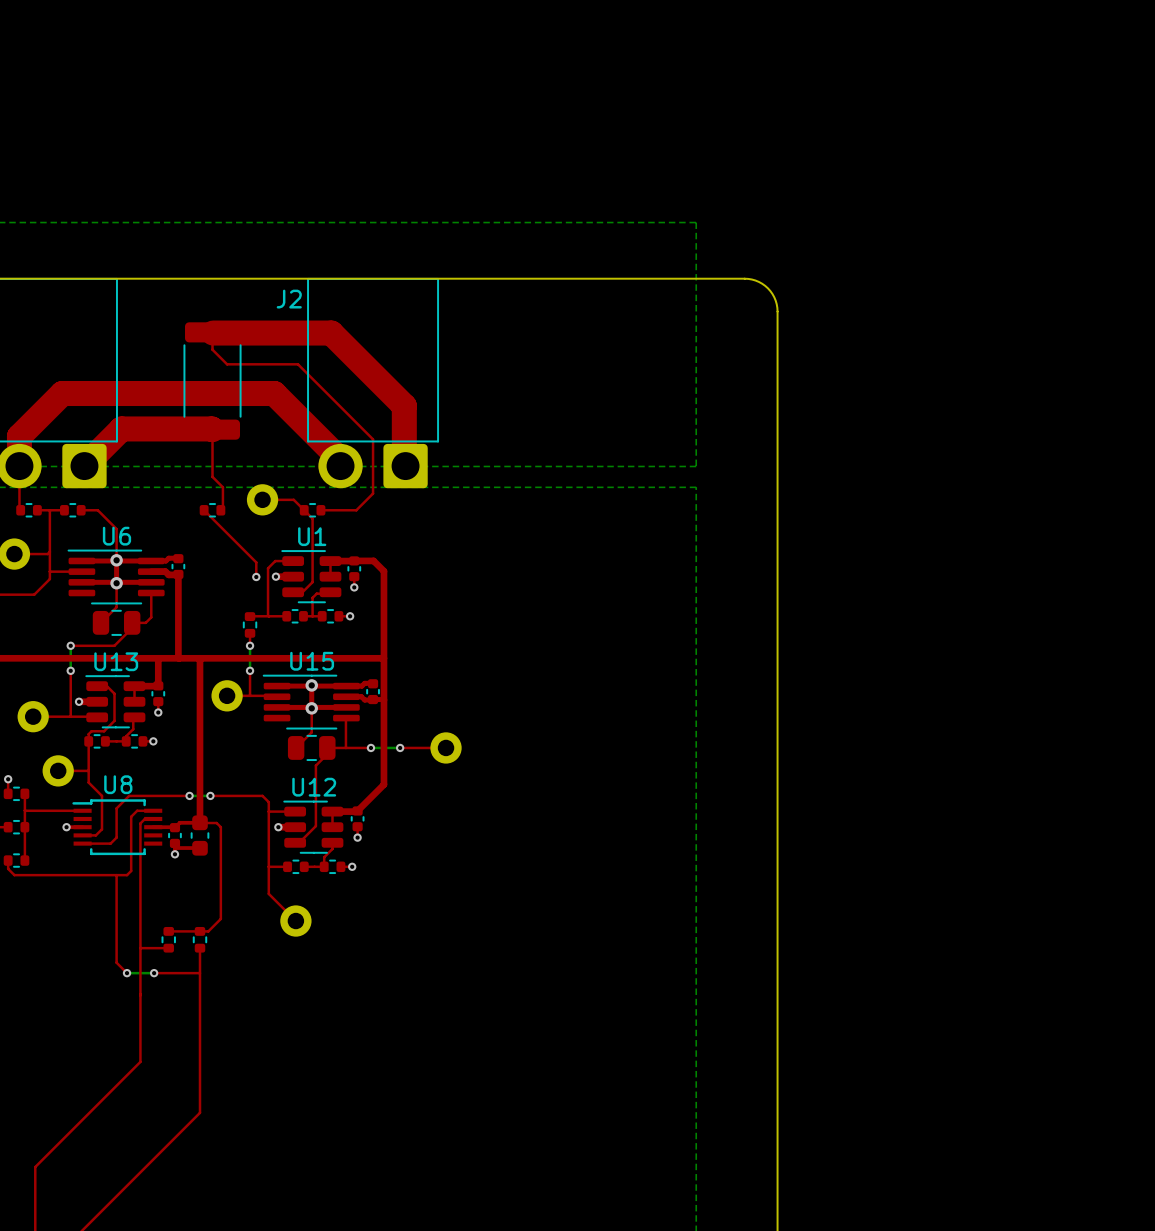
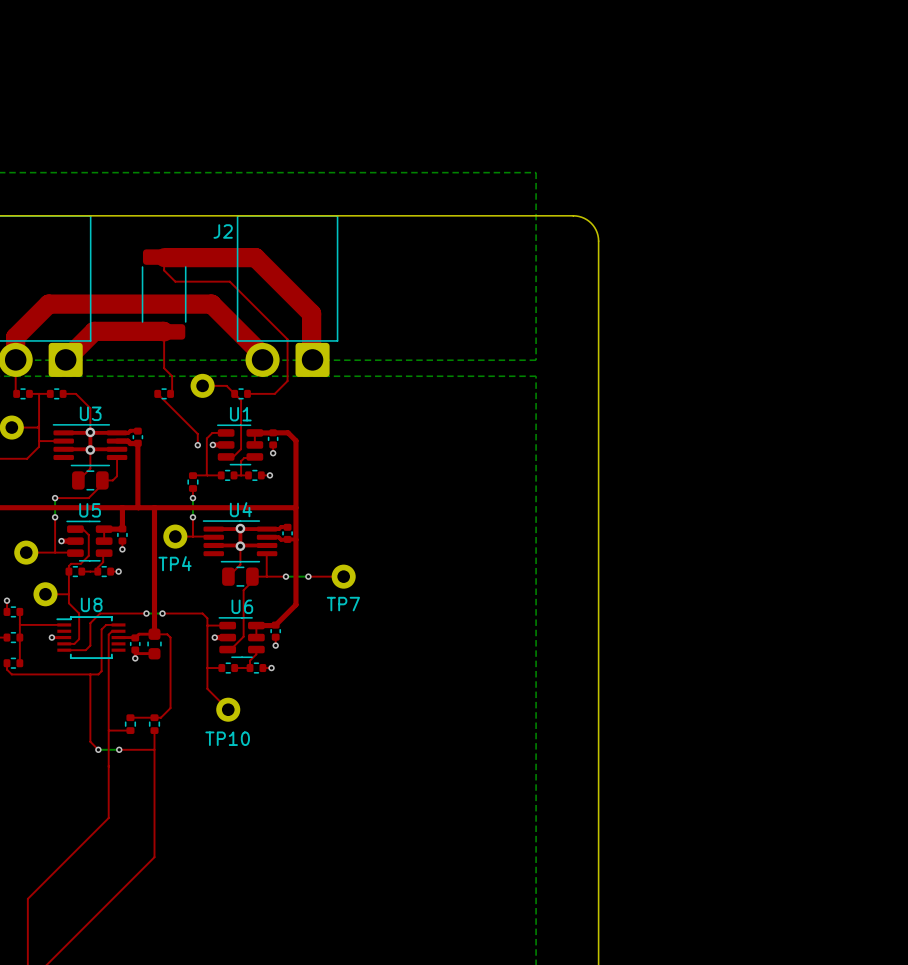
U6 name: U6 (116, 536) -> U3 (90, 413)
U13 name: U13 (116, 661) -> U5 (90, 510)
U15 name: U15 (312, 661) -> U4 (241, 509)
text: none -> TP4 (175, 563)
text: none -> TP7 (343, 604)
U12 name: U12 (314, 787) -> U6 (242, 606)
text: none -> TP10 (227, 738)

